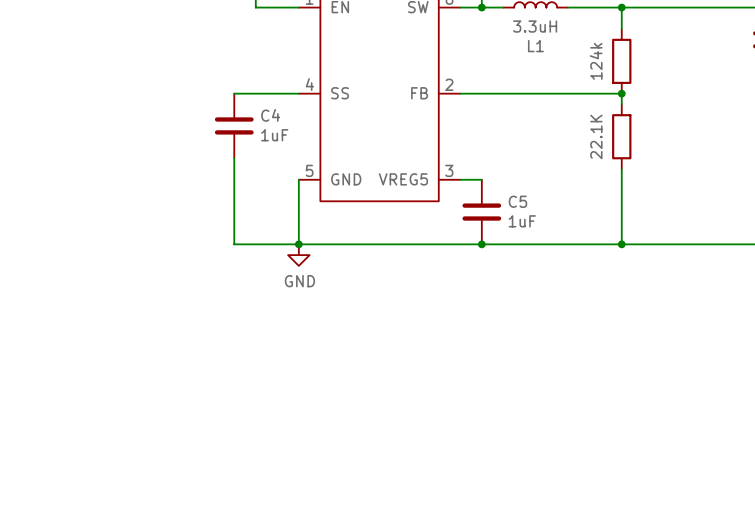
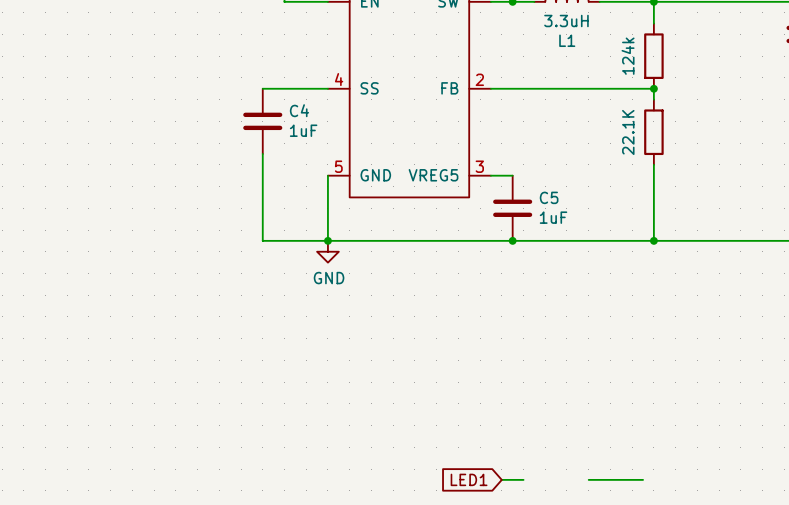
global label: none -> LED1 (469, 479)
wire: none -> (501, 479) (523, 479)
wire: none -> (588, 479) (643, 479)

